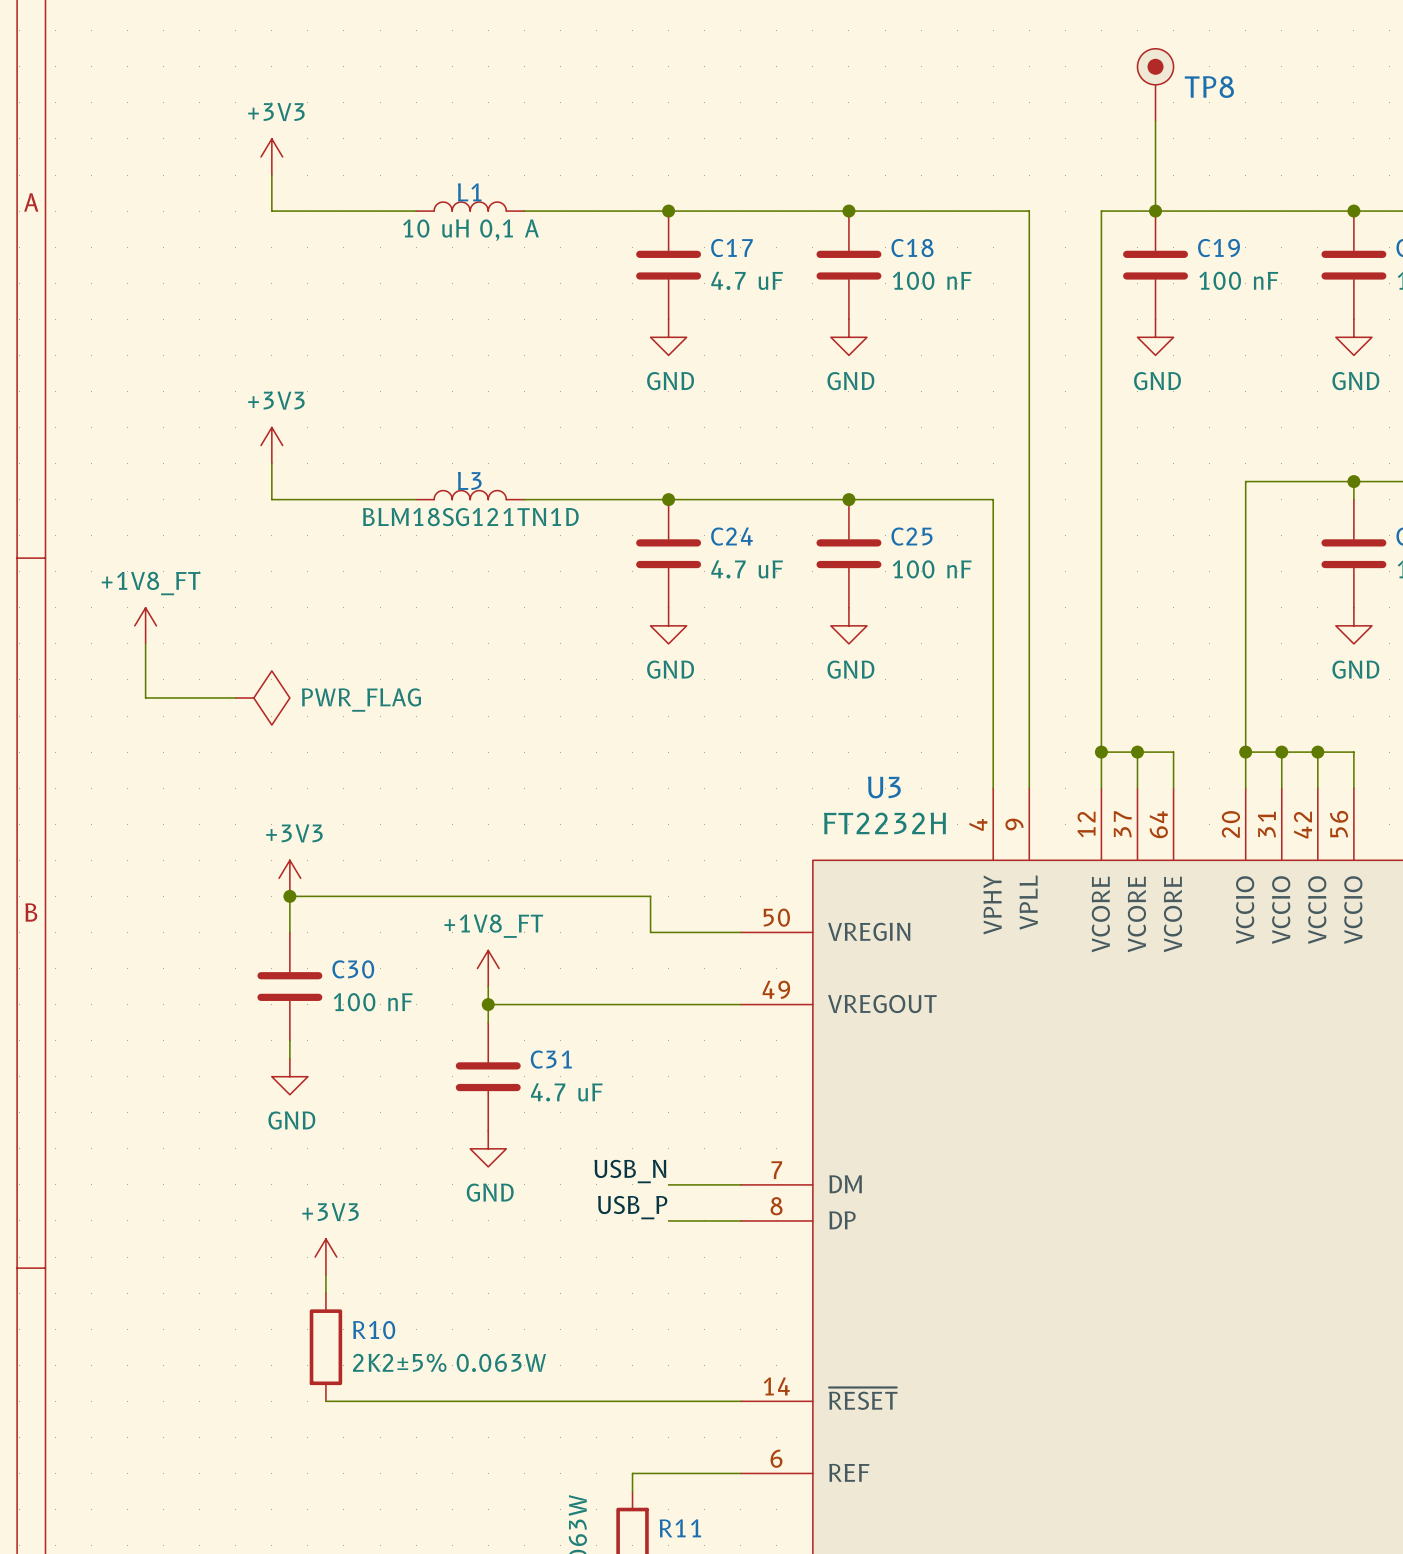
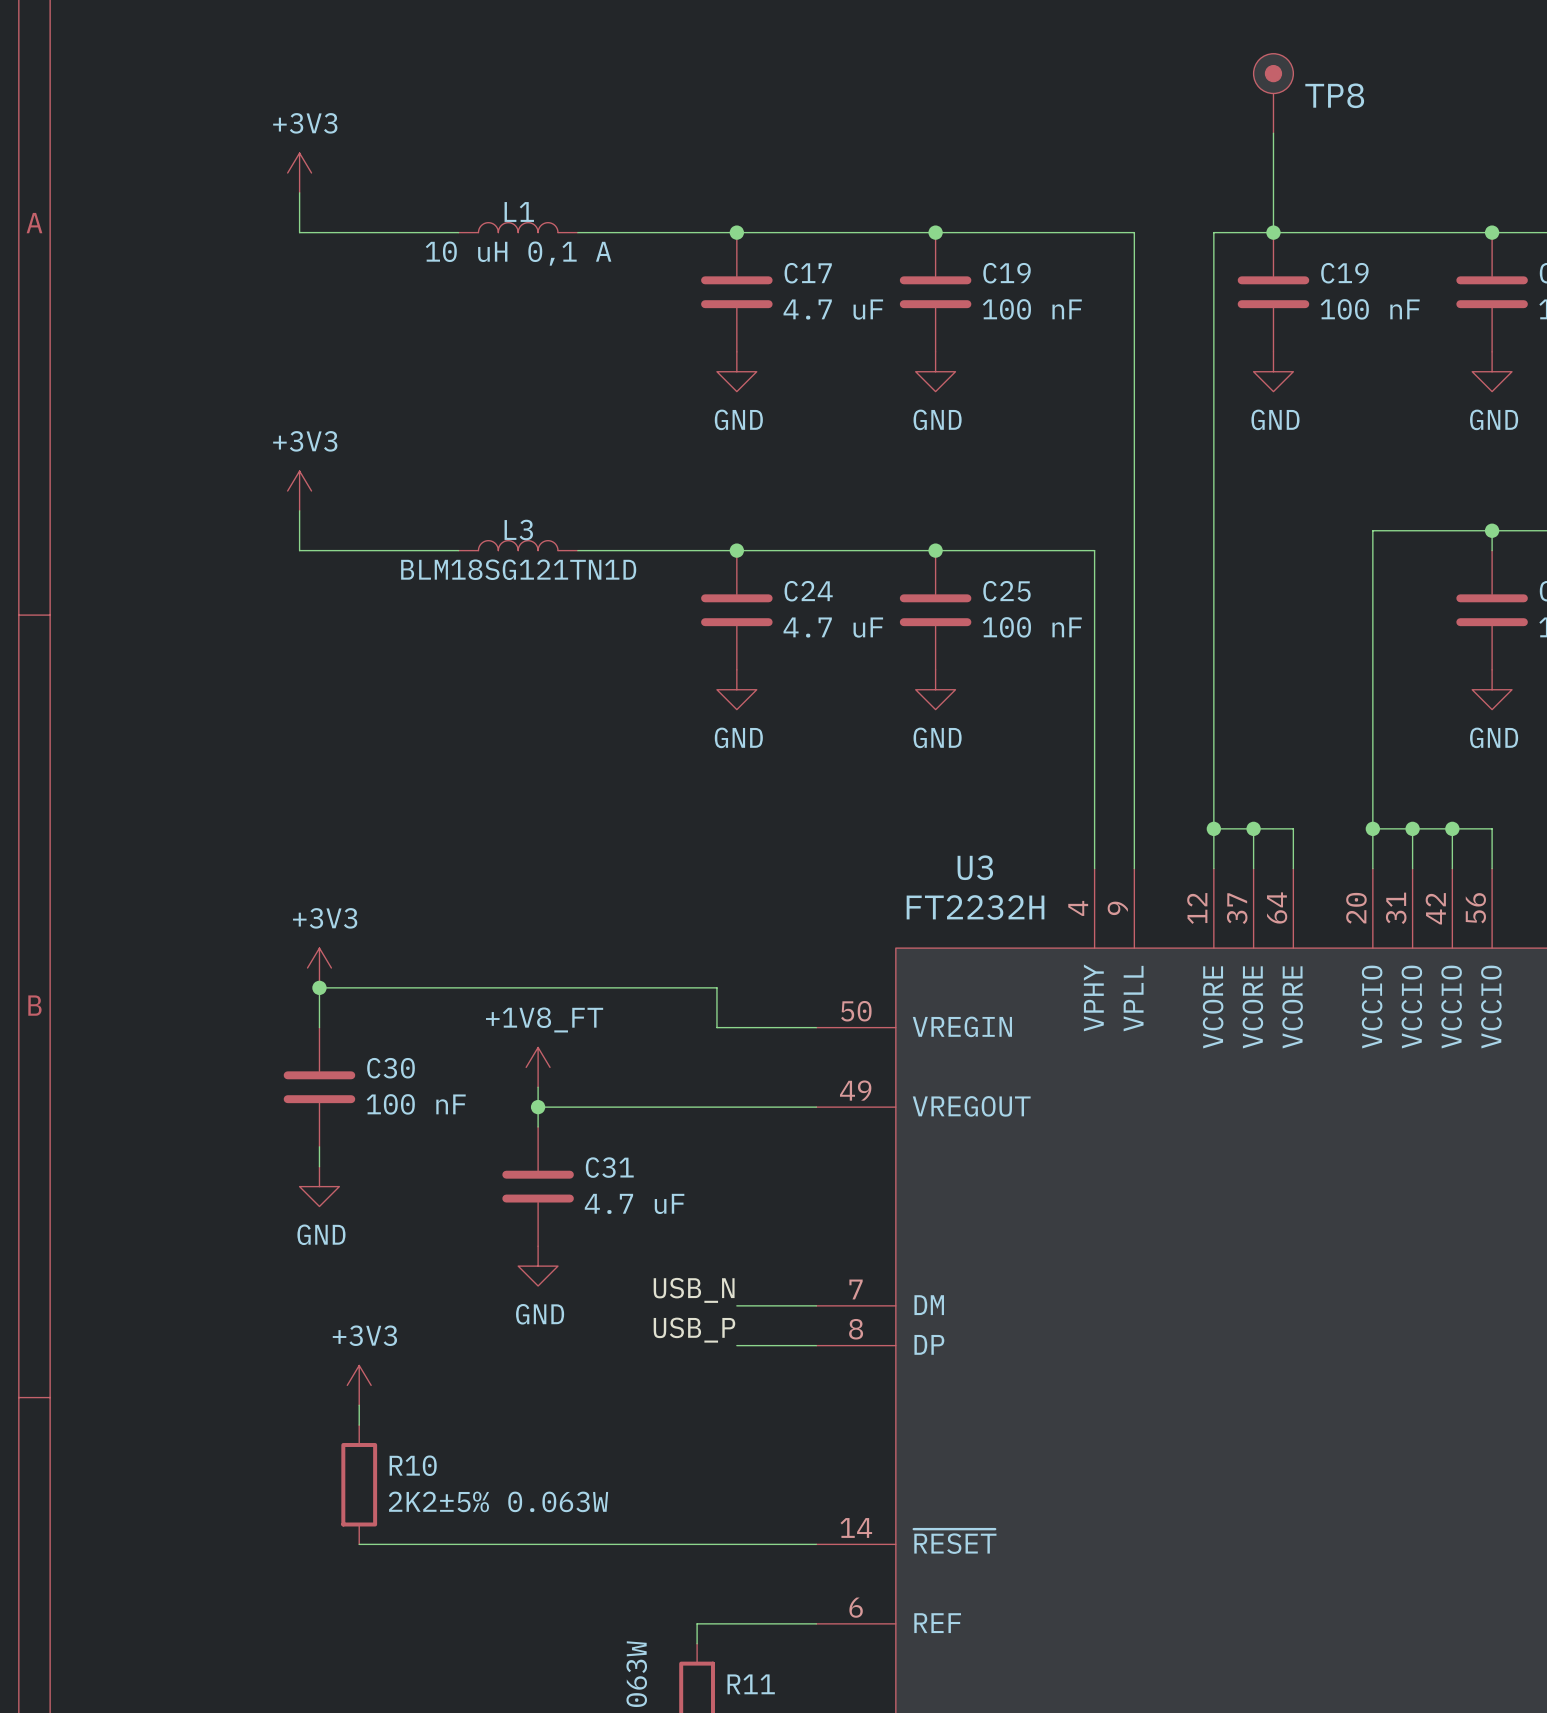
C18 name: C18 (912, 248) -> C19 (1007, 273)
power symbol: +1V8_FT (145, 625) -> none
wire: (145, 643) (145, 697) (235, 697) -> none
power symbol: PWR_FLAG (262, 697) -> none

